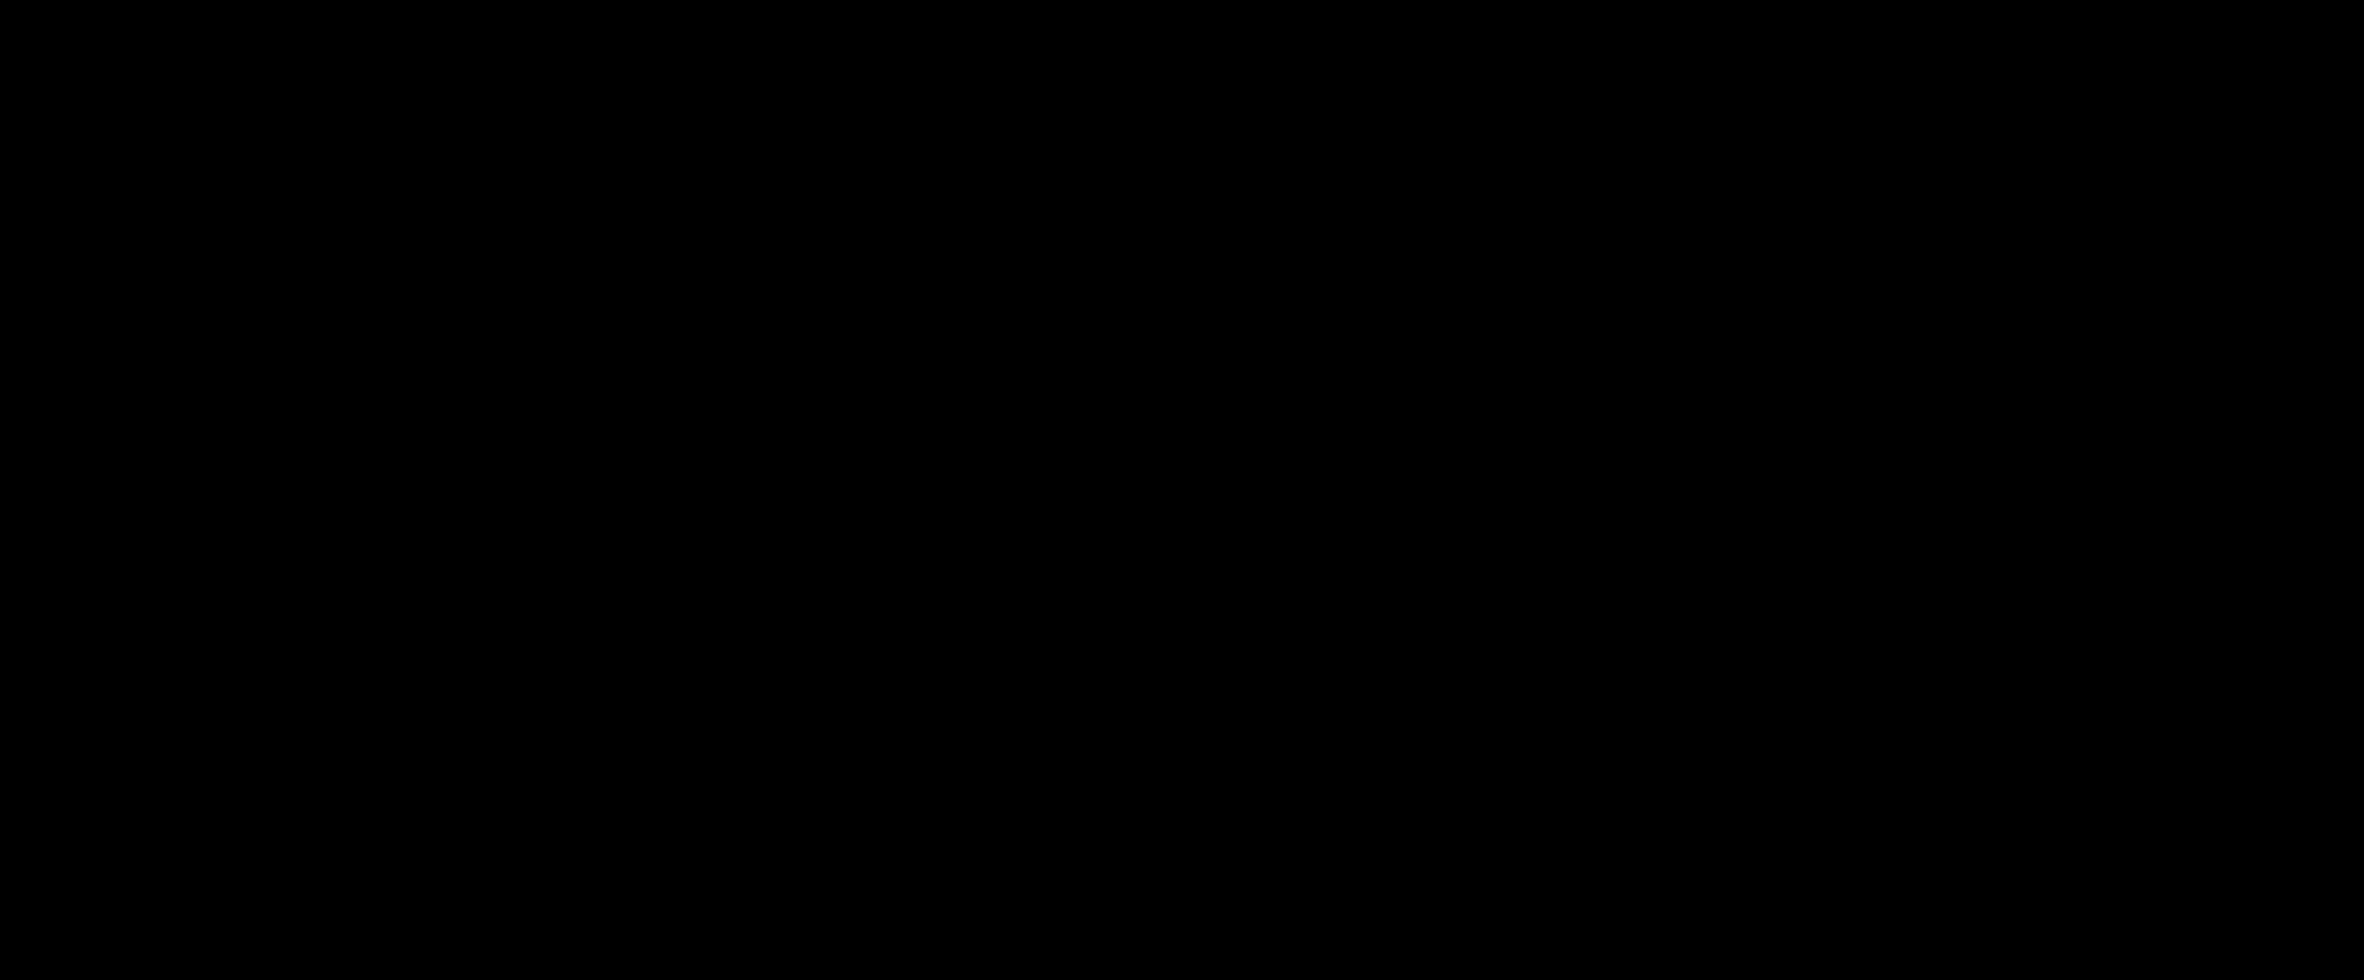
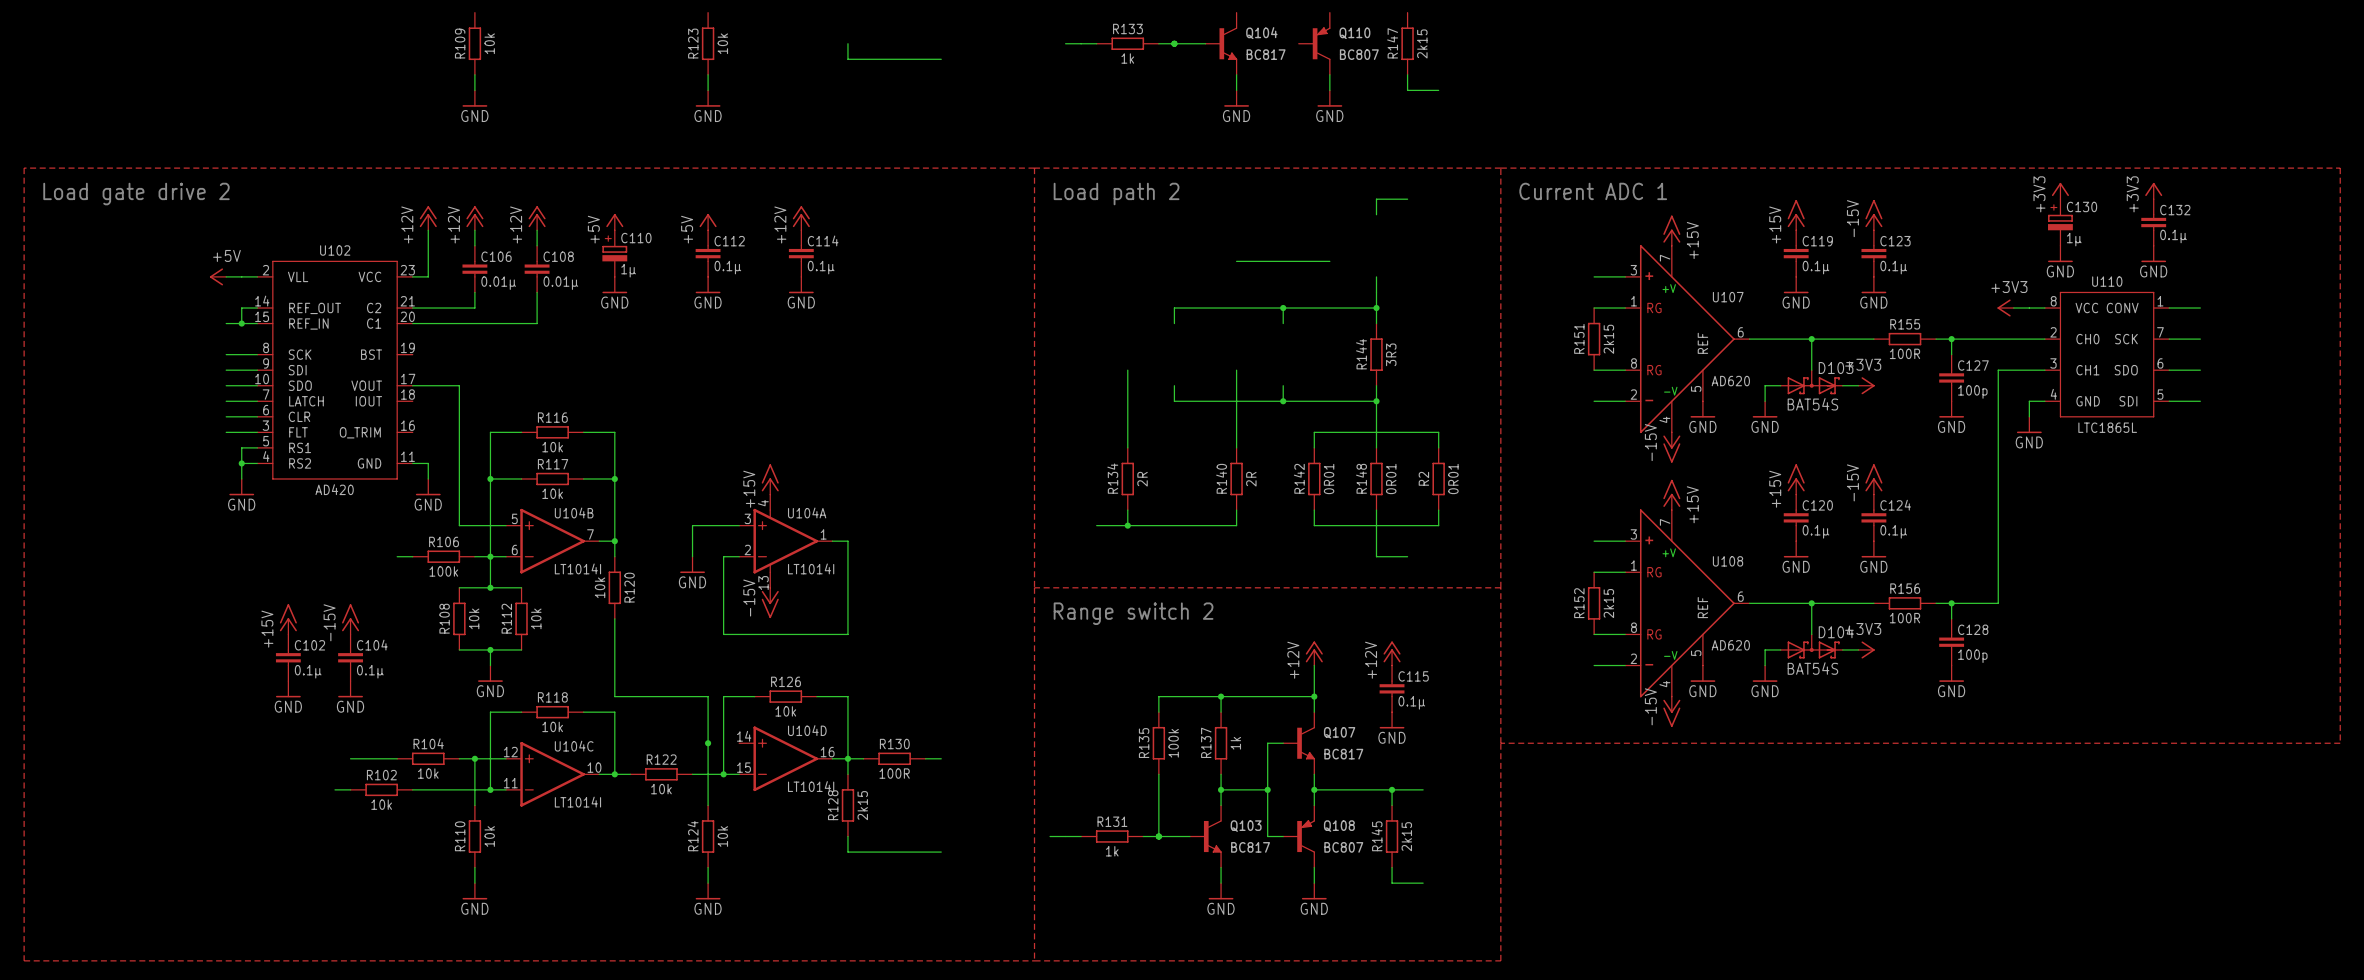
R109: none -> 10k (474, 43)
R123: none -> 10k (708, 43)
wire: none -> (847, 43) (847, 59) (941, 59)
wire: none -> (1065, 43) (1096, 43)
R133: none -> 1k (1127, 43)
wire: none -> (1158, 43) (1205, 43)
junction: none -> (1174, 43)
Q104: none -> BC817 (1221, 43)
Q110: none -> BC807 (1314, 43)
R147: none -> 2k15 (1407, 43)
wire: none -> (474, 74) (474, 90)
wire: none -> (708, 74) (708, 90)
wire: none -> (1236, 74) (1236, 90)
wire: none -> (1329, 74) (1329, 90)
wire: none -> (1407, 74) (1407, 90) (1438, 90)
power symbol: none -> GND (474, 98)
power symbol: none -> GND (708, 98)
power symbol: none -> GND (1236, 98)
power symbol: none -> GND (1329, 98)
line: none -> (1034, 168) (1034, 960)
line: none -> (1500, 168) (1500, 960) (24, 960) (24, 168) (2340, 168) (2340, 743) (1500, 743)
text: none -> Current ADC 1 (1593, 191)
power symbol: none -> +3V3 (2060, 191)
power symbol: none -> +3V3 (2153, 191)
text: none -> Load gate drive 2 (136, 194)
text: none -> Load path 2 (1116, 194)
wire: none -> (1407, 199) (1376, 199) (1376, 214)
power symbol: none -> +15V (1796, 215)
power symbol: none -> -15V (1873, 215)
power symbol: none -> +12V (428, 218)
power symbol: none -> +12V (474, 218)
power symbol: none -> +12V (537, 218)
power symbol: none -> +12V (801, 218)
power symbol: none -> +5V (614, 222)
power symbol: none -> +5V (708, 222)
C130: none -> 1µ (2060, 222)
C132: none -> 0.1µ (2153, 222)
wire: none -> (428, 230) (428, 276) (412, 276)
wire: none -> (474, 230) (474, 245)
wire: none -> (537, 230) (537, 245)
power symbol: none -> +15V (1671, 230)
C110: none -> 1µ (614, 253)
C112: none -> 0.1µ (708, 253)
C114: none -> 0.1µ (801, 253)
C119: none -> 0.1µ (1796, 253)
C123: none -> 0.1µ (1873, 253)
power symbol: none -> GND (2060, 253)
power symbol: none -> GND (2153, 253)
wire: none -> (1236, 261) (1329, 261)
C106: none -> 0.01µ (474, 269)
C108: none -> 0.01µ (537, 269)
power symbol: none -> +5V (218, 276)
wire: none -> (226, 276) (257, 276)
wire: none -> (1376, 276) (1376, 323)
wire: none -> (1594, 276) (1625, 276)
power symbol: none -> GND (614, 285)
power symbol: none -> GND (708, 285)
power symbol: none -> GND (801, 285)
power symbol: none -> GND (1796, 285)
power symbol: none -> GND (1873, 285)
wire: none -> (474, 292) (474, 308) (412, 308)
wire: none -> (537, 292) (537, 323) (412, 323)
wire: none -> (257, 308) (241, 308) (241, 323)
wire: none -> (1283, 308) (1283, 323)
junction: none -> (1283, 308)
wire: none -> (1376, 308) (1174, 308) (1174, 323)
junction: none -> (1376, 308)
wire: none -> (1594, 308) (1625, 308)
power symbol: none -> +3V3 (2005, 308)
wire: none -> (2013, 308) (2044, 308)
wire: none -> (2169, 308) (2200, 308)
wire: none -> (226, 323) (257, 323)
junction: none -> (241, 323)
R151: none -> 2k15 (1594, 339)
U107: none -> AD620 (1687, 339)
wire: none -> (1749, 339) (1873, 339)
wire: none -> (1811, 339) (1811, 370)
junction: none -> (1811, 339)
R155: none -> 100R (1905, 339)
wire: none -> (1936, 339) (2044, 339)
wire: none -> (1951, 339) (1951, 354)
junction: none -> (1951, 339)
wire: none -> (2169, 339) (2200, 339)
wire: none -> (226, 354) (257, 354)
R144: none -> 3R3 (1376, 354)
U110: none -> LTC1865L (2107, 354)
wire: none -> (226, 370) (257, 370)
U102: none -> AD420 (335, 370)
wire: none -> (1127, 370) (1127, 447)
wire: none -> (1236, 370) (1236, 447)
wire: none -> (1594, 370) (1625, 370)
wire: none -> (2044, 370) (1998, 370) (1998, 603) (1936, 603)
wire: none -> (2169, 370) (2200, 370)
C127: none -> 100p (1951, 377)
D103: none -> BAT54S (1811, 382)
wire: none -> (226, 385) (257, 385)
wire: none -> (412, 385) (459, 385) (459, 525) (506, 525)
wire: none -> (1174, 385) (1174, 401) (1376, 401)
wire: none -> (1283, 385) (1283, 401)
wire: none -> (1376, 385) (1376, 447)
wire: none -> (1780, 385) (1765, 385) (1765, 401)
wire: none -> (1842, 385) (1858, 385)
power symbol: none -> +3V3 (1866, 385)
wire: none -> (226, 401) (257, 401)
junction: none -> (1283, 401)
junction: none -> (1376, 401)
wire: none -> (1594, 401) (1625, 401)
wire: none -> (2044, 401) (2029, 401) (2029, 416)
wire: none -> (2169, 401) (2200, 401)
power symbol: none -> GND (1702, 409)
power symbol: none -> GND (1765, 409)
power symbol: none -> GND (1951, 409)
wire: none -> (226, 416) (257, 416)
power symbol: none -> GND (2029, 424)
wire: none -> (226, 432) (257, 432)
wire: none -> (521, 432) (490, 432) (490, 587)
R116: none -> 10k (552, 432)
wire: none -> (583, 432) (614, 432) (614, 556)
wire: none -> (257, 447) (241, 447) (241, 478)
wire: none -> (1314, 447) (1314, 432) (1438, 432) (1438, 447)
power symbol: none -> -15V (1671, 447)
wire: none -> (241, 463) (257, 463)
junction: none -> (241, 463)
wire: none -> (412, 463) (428, 463) (428, 478)
wire: none -> (490, 478) (521, 478)
junction: none -> (490, 478)
R117: none -> 10k (552, 478)
wire: none -> (583, 478) (614, 478)
junction: none -> (614, 478)
R134: none -> 2R (1127, 478)
R140: none -> 2R (1236, 478)
R142: none -> 0R01 (1314, 478)
R148: none -> 0R01 (1376, 478)
R2: none -> 0R01 (1438, 478)
power symbol: none -> +15V (770, 479)
power symbol: none -> +15V (1796, 479)
power symbol: none -> -15V (1873, 479)
power symbol: none -> GND (241, 487)
power symbol: none -> GND (428, 487)
power symbol: none -> +15V (1671, 494)
wire: none -> (1127, 510) (1127, 525)
wire: none -> (1236, 510) (1236, 525) (1096, 525)
wire: none -> (1314, 510) (1314, 525) (1438, 525) (1438, 510)
wire: none -> (1376, 510) (1376, 556) (1407, 556)
C120: none -> 0.1µ (1796, 517)
C124: none -> 0.1µ (1873, 517)
wire: none -> (739, 525) (692, 525) (692, 556)
junction: none -> (1127, 525)
U104B: none -> LT1014I (552, 541)
wire: none -> (599, 541) (614, 541)
junction: none -> (614, 541)
U104A: none -> LT1014I (785, 541)
wire: none -> (832, 541) (847, 541) (847, 634) (723, 634) (723, 556) (739, 556)
wire: none -> (1594, 541) (1625, 541)
power symbol: none -> GND (1796, 549)
power symbol: none -> GND (1873, 549)
wire: none -> (397, 556) (412, 556)
R106: none -> 100k (443, 556)
wire: none -> (474, 556) (506, 556)
junction: none -> (490, 556)
power symbol: none -> GND (692, 564)
wire: none -> (1594, 572) (1625, 572)
wire: none -> (459, 587) (521, 587)
junction: none -> (490, 587)
R120: none -> 10k (614, 587)
line: none -> (1034, 587) (1500, 587)
power symbol: none -> -15V (770, 602)
R152: none -> 2k15 (1594, 603)
U108: none -> AD620 (1687, 603)
wire: none -> (1749, 603) (1873, 603)
wire: none -> (1811, 603) (1811, 634)
junction: none -> (1811, 603)
R156: none -> 100R (1905, 603)
wire: none -> (1951, 603) (1951, 618)
junction: none -> (1951, 603)
text: none -> Range switch 2 (1133, 613)
R108: none -> 10k (459, 618)
R112: none -> 10k (521, 618)
wire: none -> (614, 618) (614, 696) (708, 696) (708, 805)
power symbol: none -> +15V (288, 619)
power symbol: none -> -15V (350, 619)
wire: none -> (1594, 634) (1625, 634)
C128: none -> 100p (1951, 642)
D104: none -> BAT54S (1811, 646)
wire: none -> (459, 649) (521, 649)
wire: none -> (490, 649) (490, 665)
junction: none -> (490, 649)
wire: none -> (1780, 649) (1765, 649) (1765, 665)
wire: none -> (1842, 649) (1858, 649)
power symbol: none -> +3V3 (1866, 649)
power symbol: none -> +12V (1314, 653)
power symbol: none -> +12V (1392, 653)
C102: none -> 0.1µ (288, 657)
C104: none -> 0.1µ (350, 657)
wire: none -> (1314, 665) (1314, 712)
wire: none -> (1594, 665) (1625, 665)
power symbol: none -> GND (490, 673)
power symbol: none -> GND (1702, 673)
power symbol: none -> GND (1765, 673)
power symbol: none -> GND (1951, 673)
C115: none -> 0.1µ (1392, 688)
power symbol: none -> GND (288, 689)
power symbol: none -> GND (350, 689)
wire: none -> (754, 696) (723, 696) (723, 774)
R126: none -> 10k (785, 696)
wire: none -> (816, 696) (847, 696) (847, 774)
wire: none -> (1221, 696) (1221, 712)
junction: none -> (1221, 696)
wire: none -> (1314, 696) (1158, 696) (1158, 712)
junction: none -> (1314, 696)
power symbol: none -> -15V (1671, 711)
wire: none -> (521, 712) (490, 712) (490, 789)
R118: none -> 10k (552, 712)
wire: none -> (583, 712) (614, 712) (614, 774)
power symbol: none -> GND (1392, 720)
junction: none -> (708, 743)
R135: none -> 100k (1158, 743)
R137: none -> 1k (1221, 743)
wire: none -> (1283, 743) (1267, 743) (1267, 836) (1283, 836)
Q107: none -> BC817 (1299, 743)
wire: none -> (350, 758) (397, 758)
R104: none -> 10k (428, 758)
wire: none -> (459, 758) (506, 758)
wire: none -> (474, 758) (474, 805)
junction: none -> (474, 758)
U104D: none -> LT1014I (785, 758)
wire: none -> (832, 758) (863, 758)
junction: none -> (847, 758)
R130: none -> 100R (894, 758)
wire: none -> (925, 758) (941, 758)
U104C: none -> LT1014I (552, 774)
wire: none -> (599, 774) (630, 774)
junction: none -> (614, 774)
R122: none -> 10k (661, 774)
wire: none -> (692, 774) (739, 774)
junction: none -> (723, 774)
wire: none -> (1158, 774) (1158, 836)
wire: none -> (1221, 774) (1221, 805)
wire: none -> (1314, 774) (1314, 805)
wire: none -> (335, 789) (350, 789)
R102: none -> 10k (381, 789)
wire: none -> (412, 789) (506, 789)
junction: none -> (490, 789)
wire: none -> (1221, 789) (1267, 789)
junction: none -> (1221, 789)
junction: none -> (1267, 789)
wire: none -> (1314, 789) (1423, 789)
junction: none -> (1314, 789)
wire: none -> (1392, 789) (1392, 805)
junction: none -> (1392, 789)
R128: none -> 2k15 (847, 805)
R110: none -> 10k (474, 836)
R124: none -> 10k (708, 836)
wire: none -> (847, 836) (847, 852) (941, 852)
wire: none -> (1050, 836) (1081, 836)
R131: none -> 1k (1112, 836)
wire: none -> (1143, 836) (1189, 836)
junction: none -> (1158, 836)
Q103: none -> BC817 (1205, 836)
Q108: none -> BC807 (1299, 836)
R145: none -> 2k15 (1392, 836)
wire: none -> (474, 867) (474, 883)
wire: none -> (708, 867) (708, 883)
wire: none -> (1221, 867) (1221, 883)
wire: none -> (1314, 867) (1314, 883)
wire: none -> (1392, 867) (1392, 883) (1423, 883)
power symbol: none -> GND (474, 891)
power symbol: none -> GND (708, 891)
power symbol: none -> GND (1221, 891)
power symbol: none -> GND (1314, 891)

